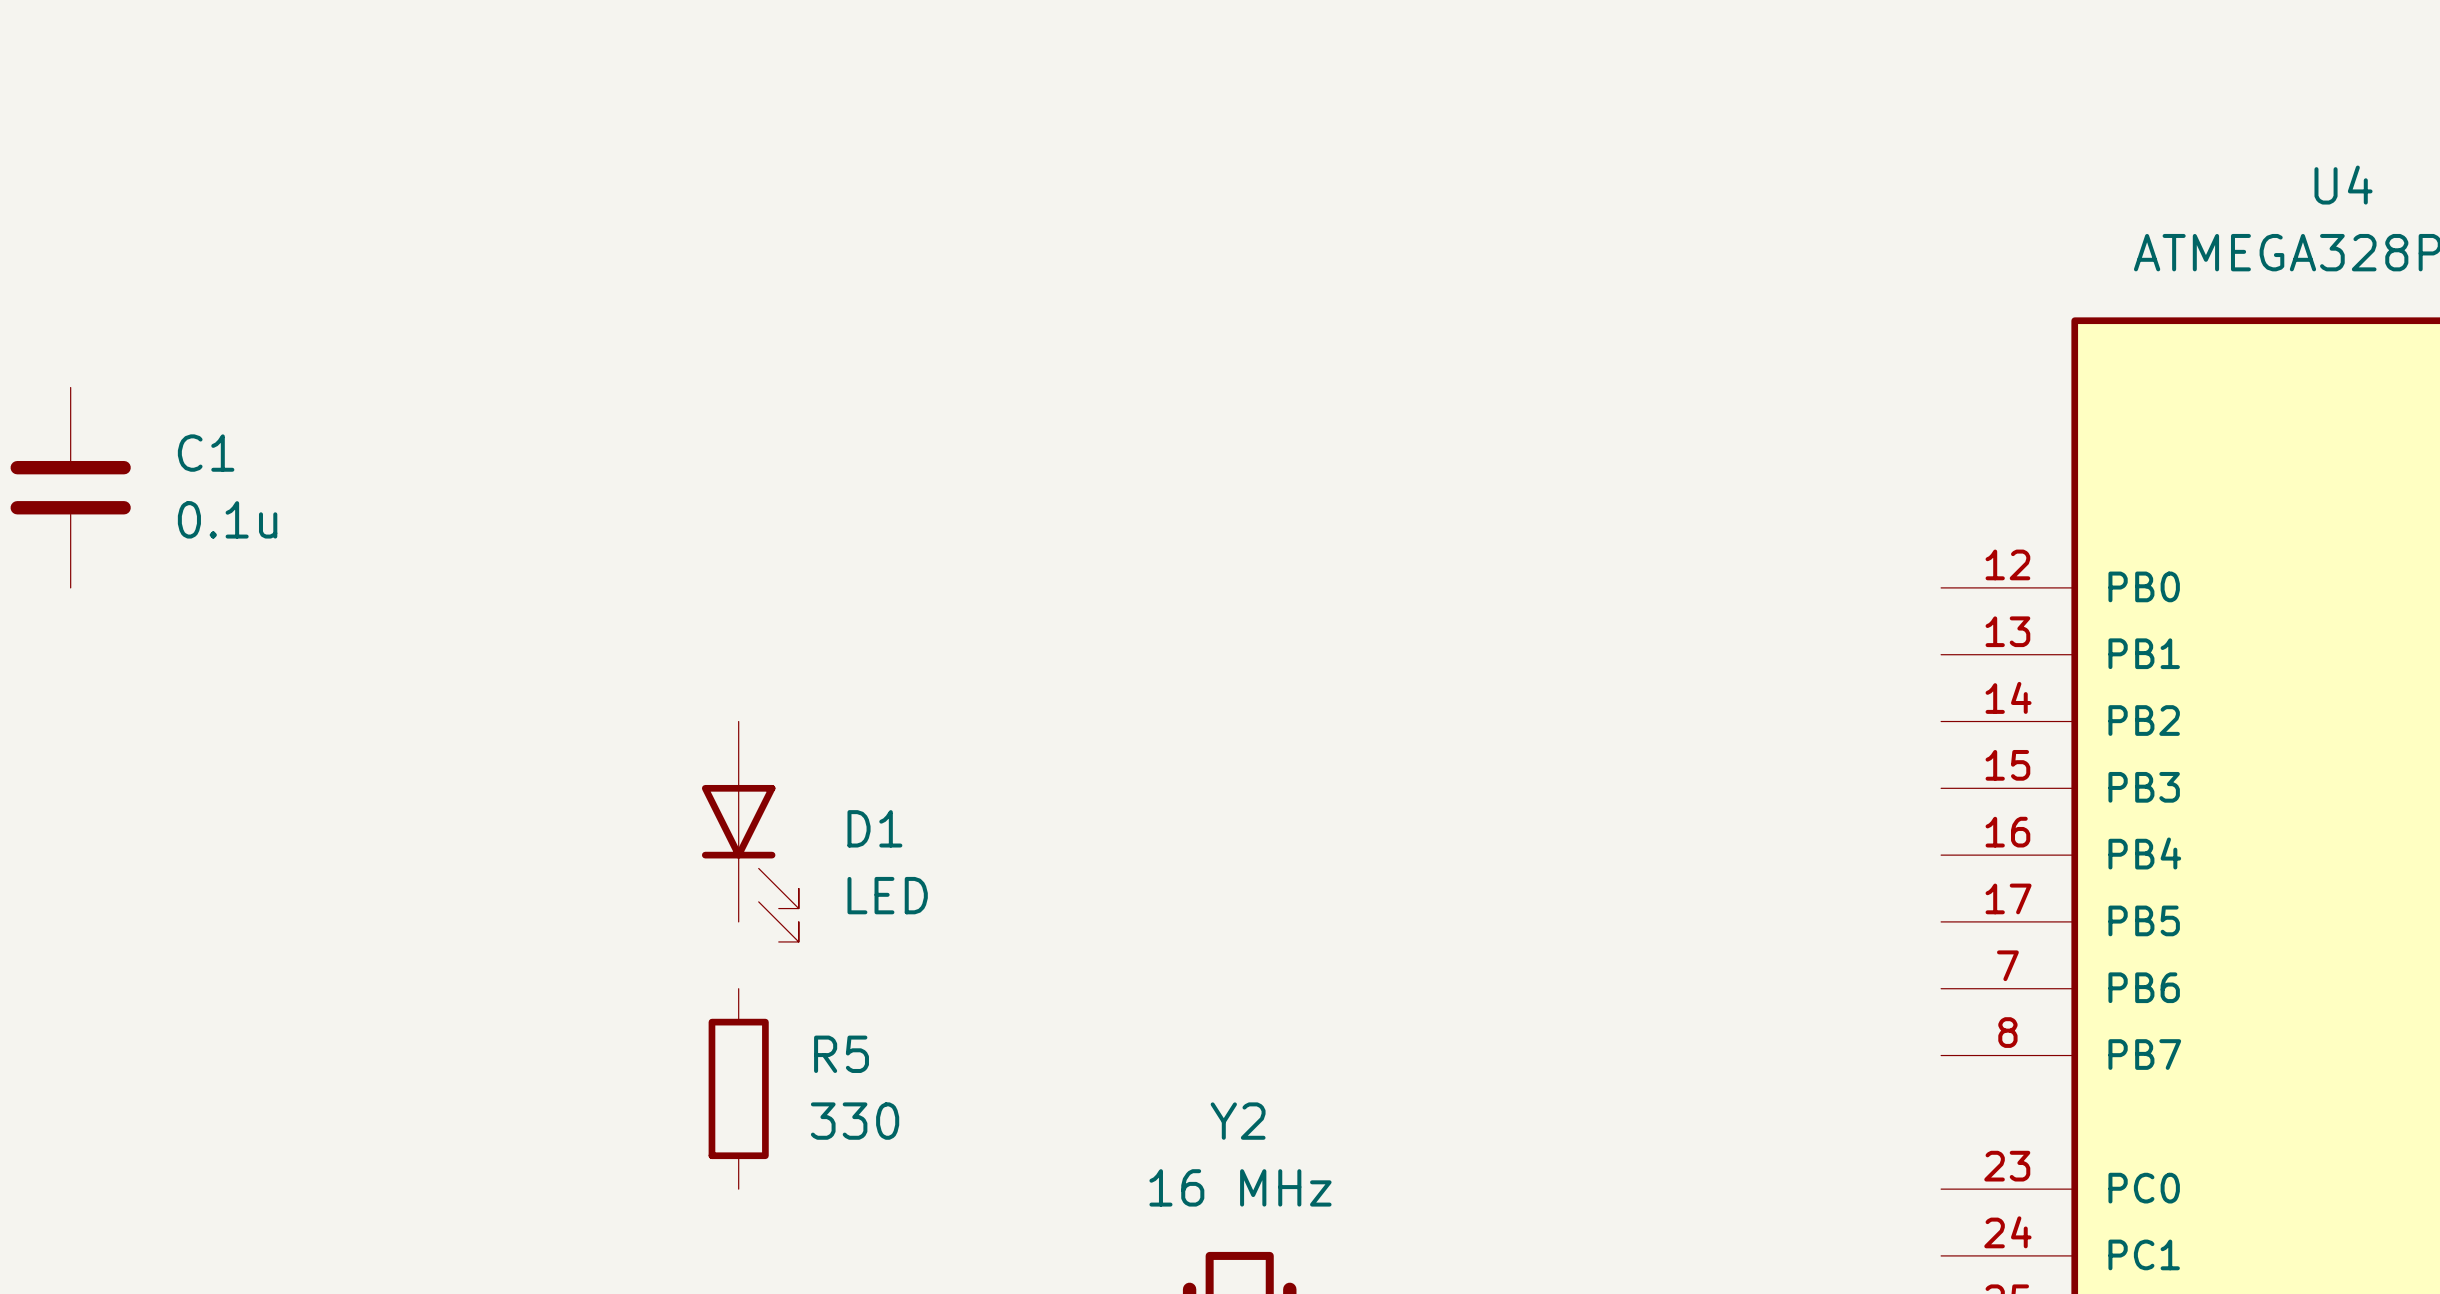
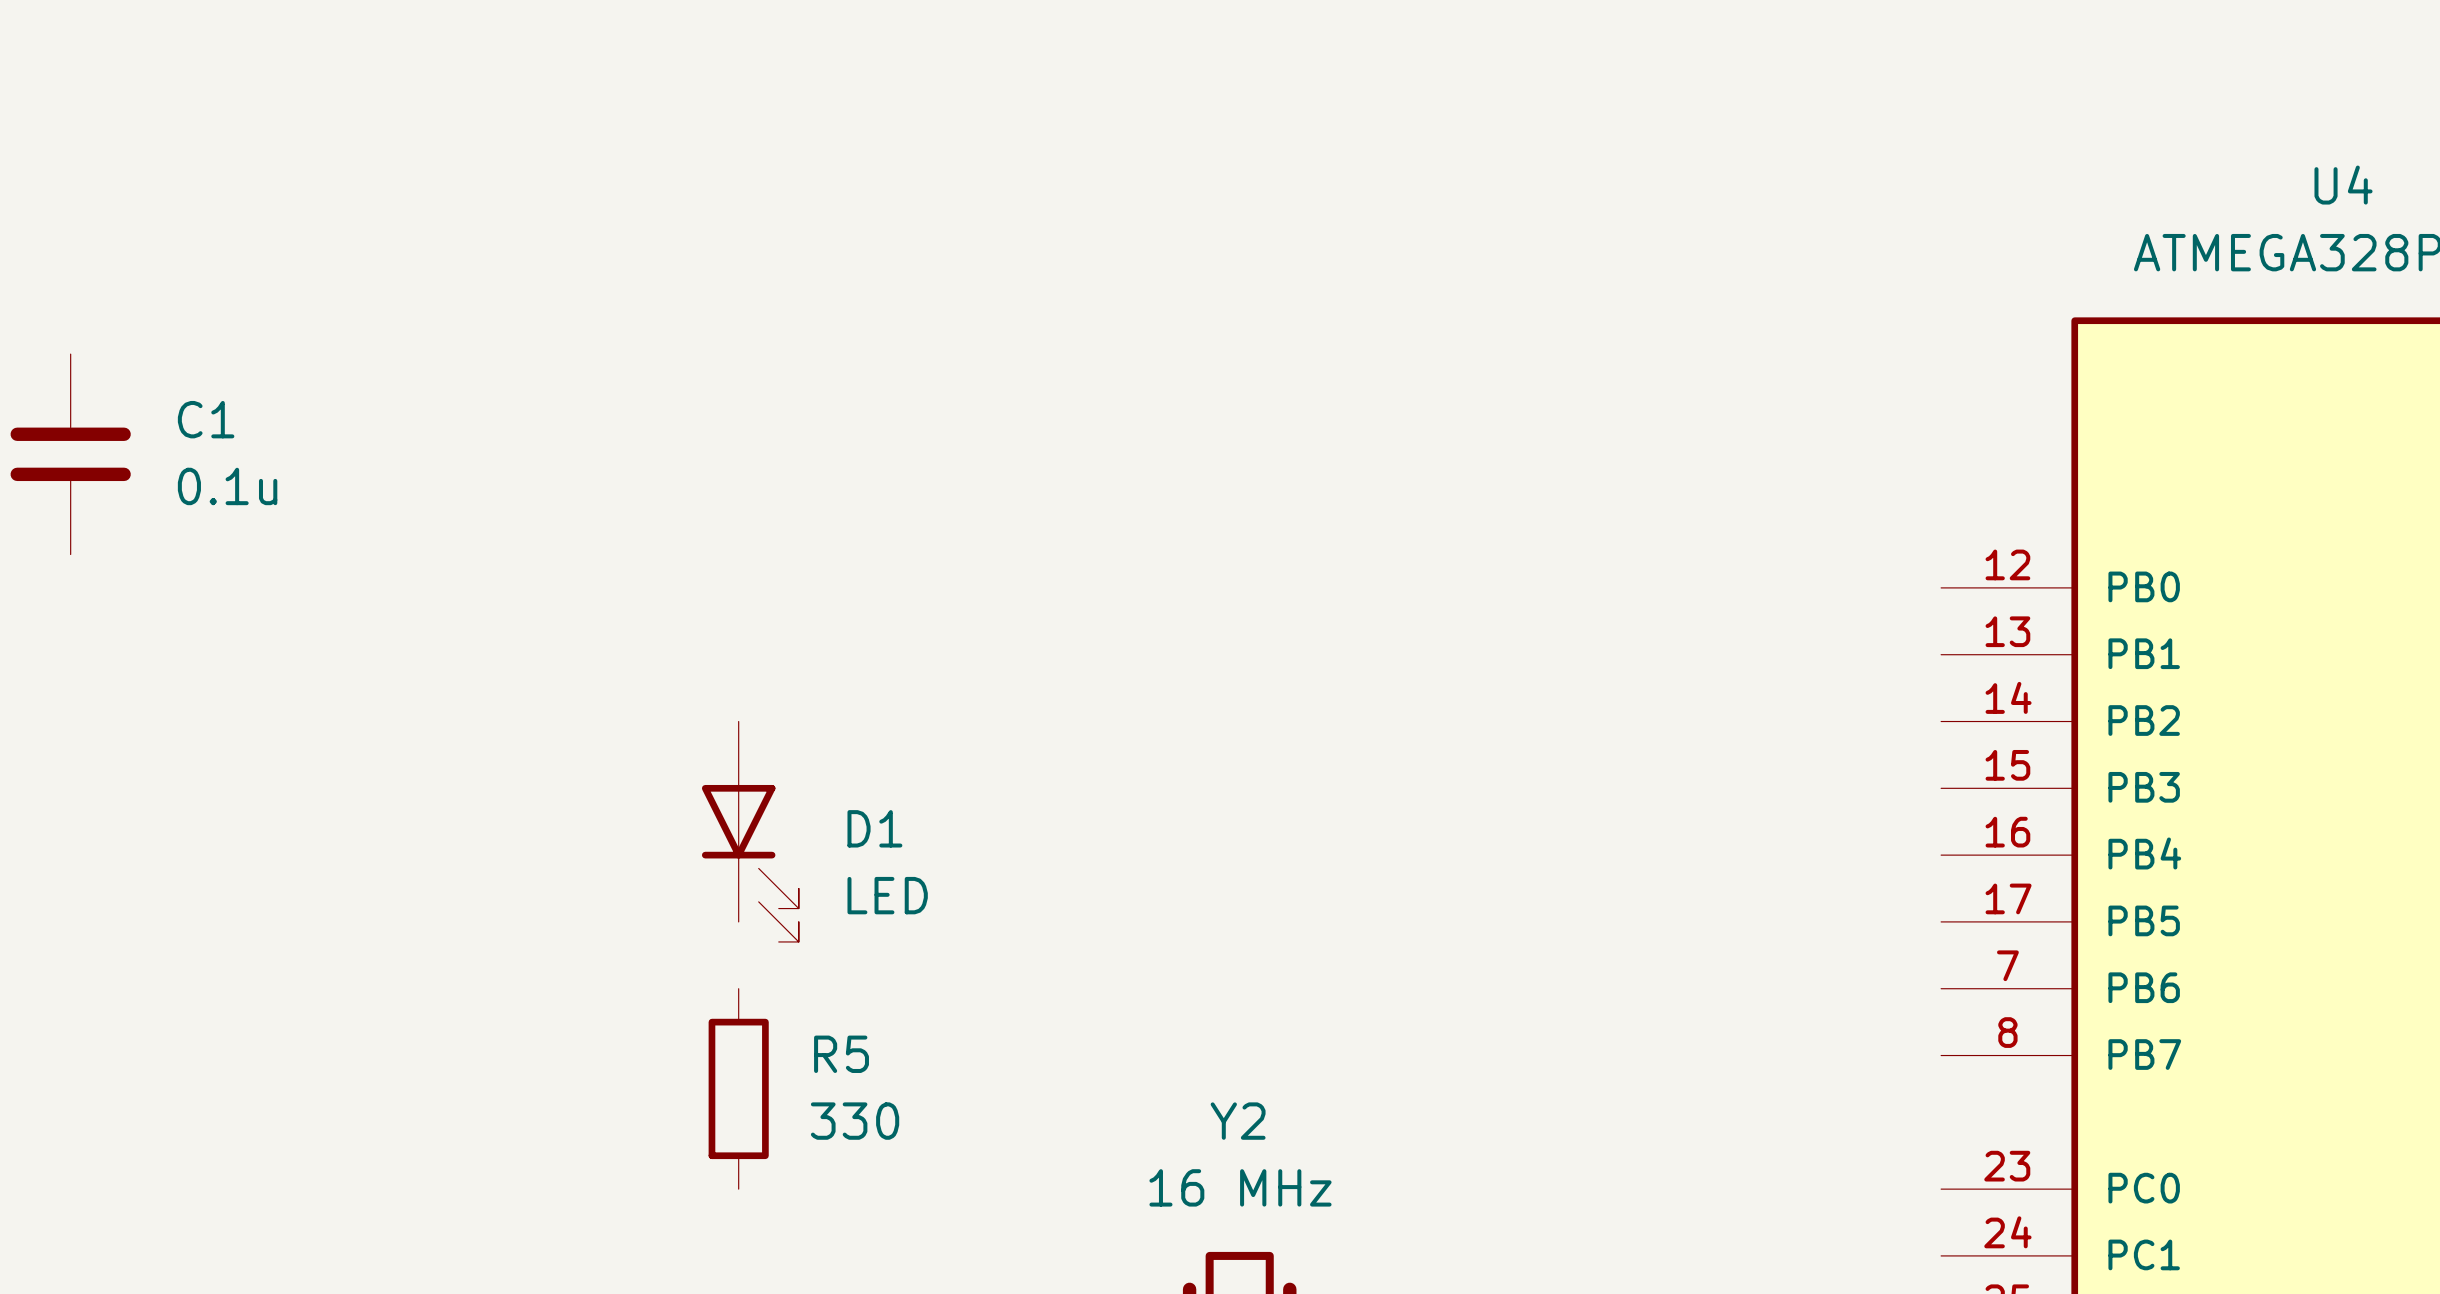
C1 position: (70, 487) -> (70, 454)

